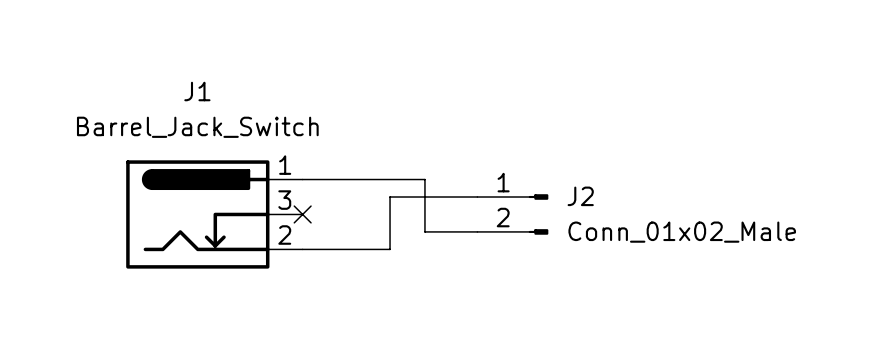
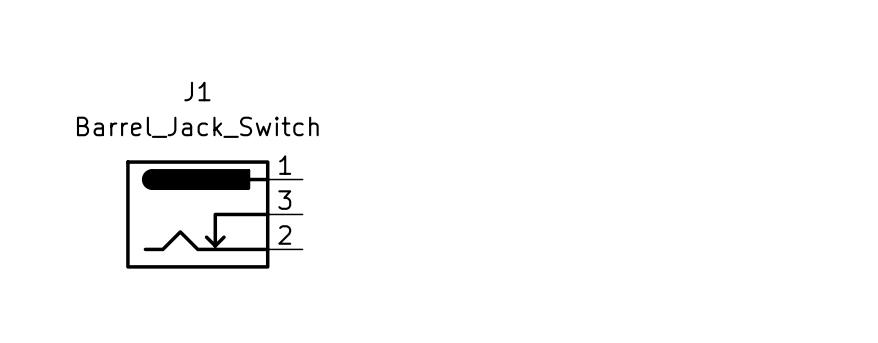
wire: (302, 179) (424, 179) (424, 231) (477, 231) -> none
wire: (477, 197) (390, 197) (390, 249) (302, 249) -> none
no-connect mark: (302, 214) -> none
J2: Conn_01x02_Male (512, 214) -> none

